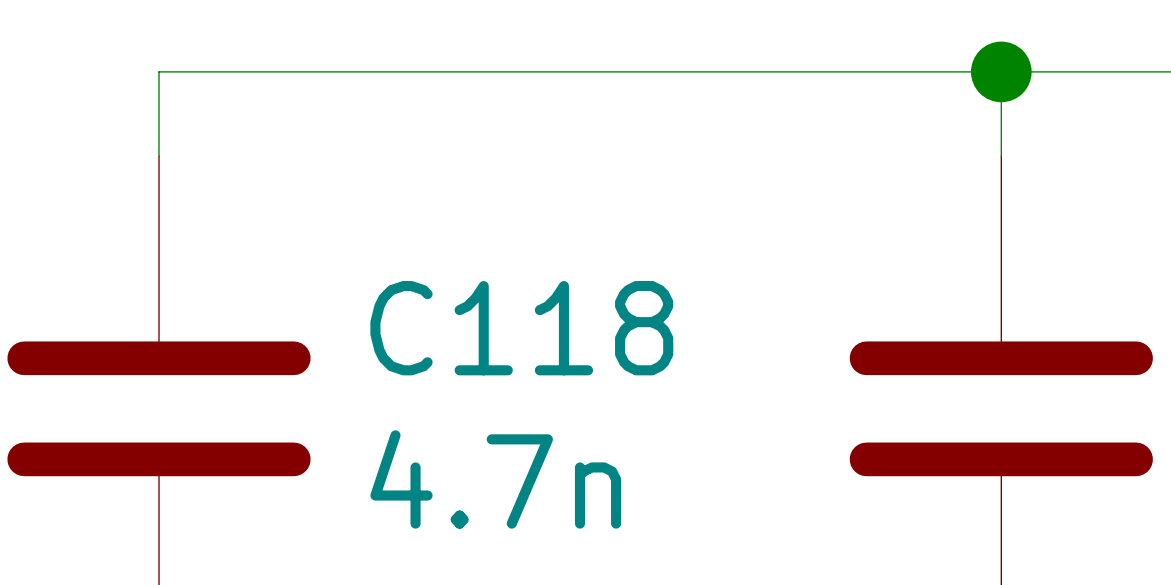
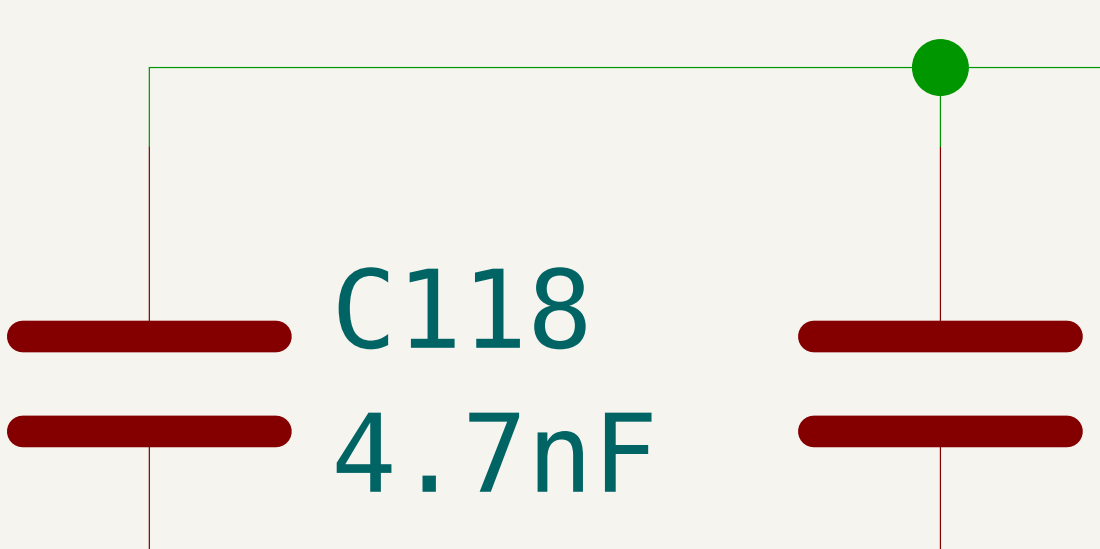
C118 value: 4.7n (495, 479) -> 4.7nF (494, 452)

